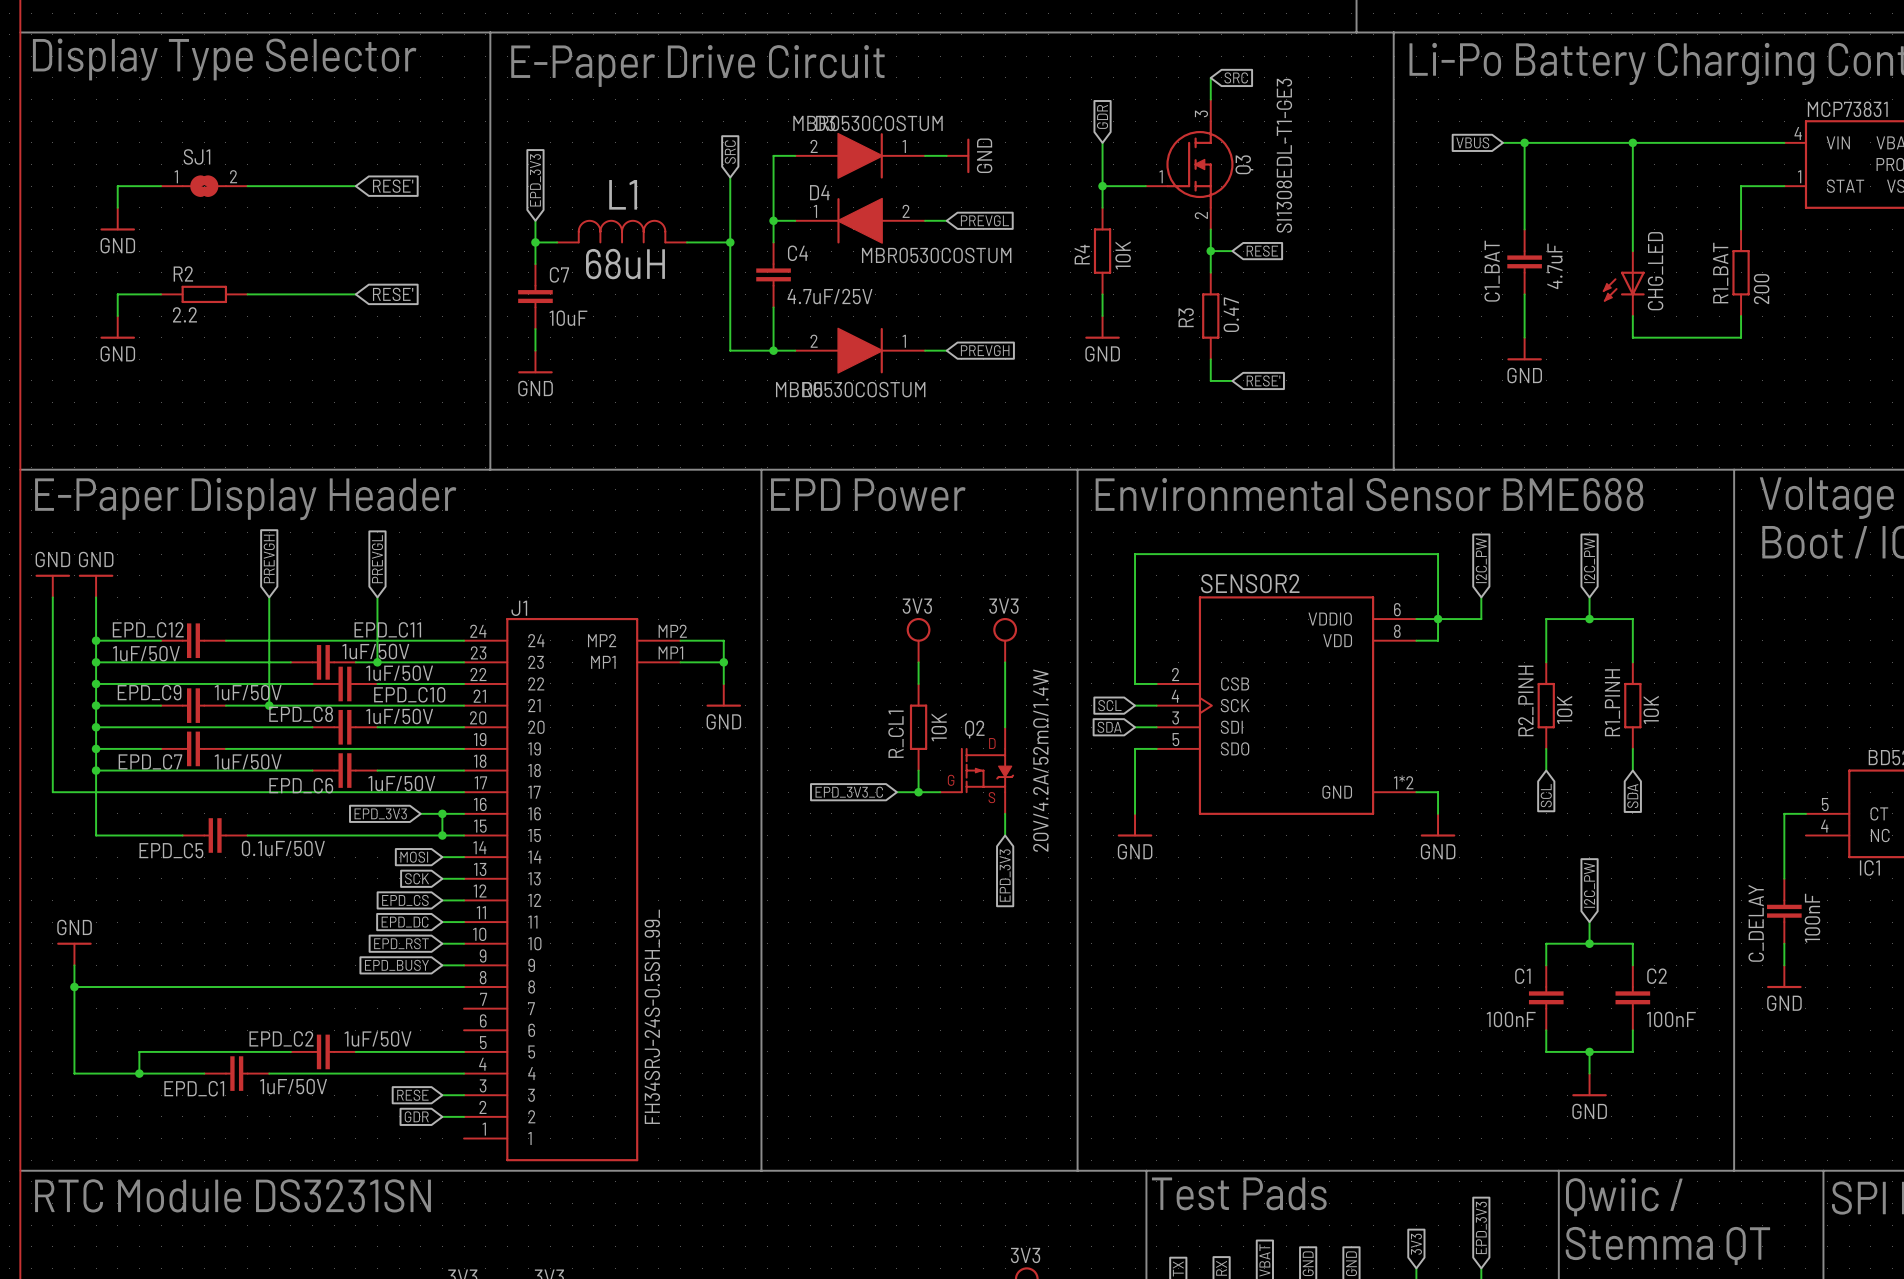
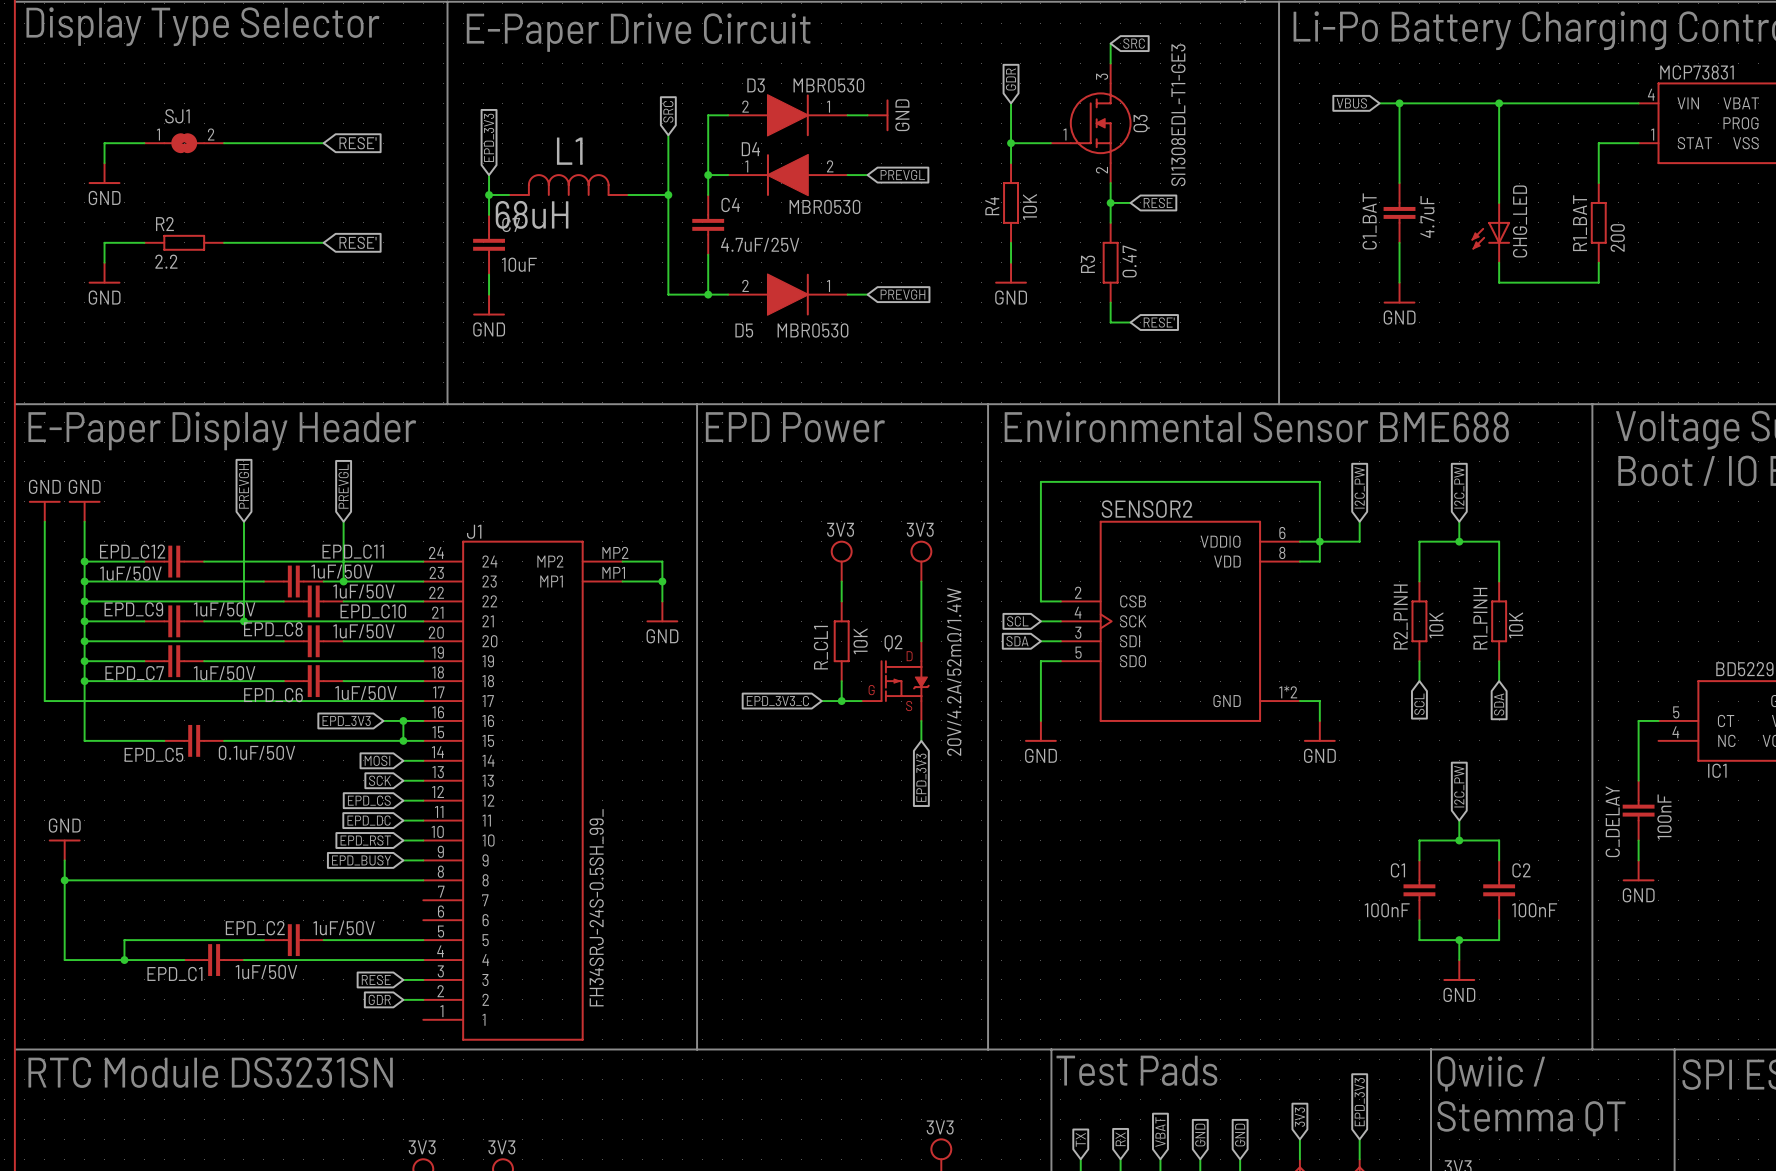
D3 value: MBR0530COSTUM (868, 123) -> MBR0530 (828, 85)
D4 value: MBR0530COSTUM (936, 255) -> MBR0530 (824, 206)
L1 value position: 68uH (625, 264) -> 68uH (532, 214)
D5 value: MBR0530COSTUM (850, 389) -> MBR0530 (812, 330)

